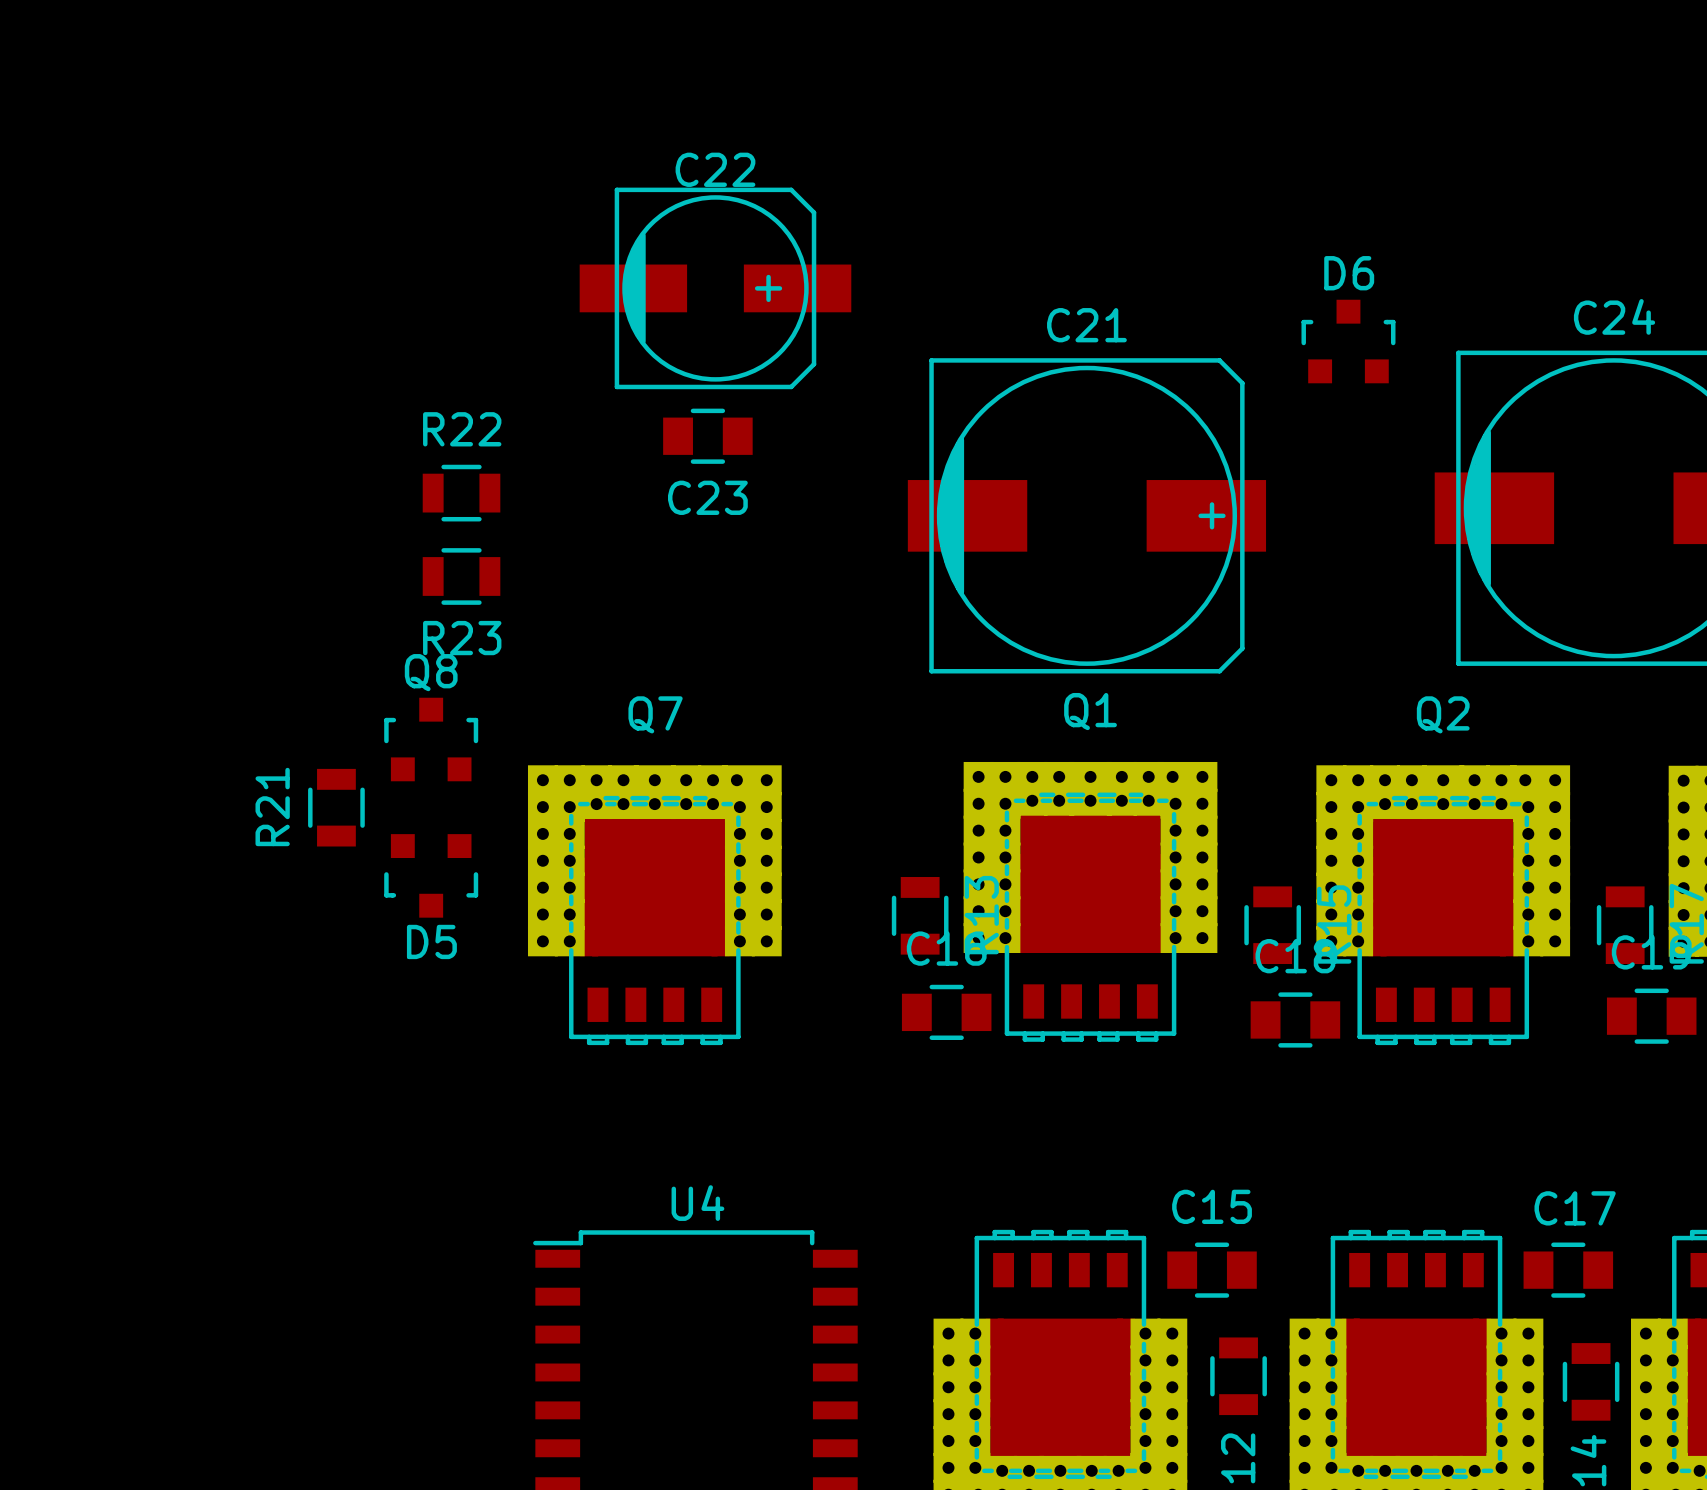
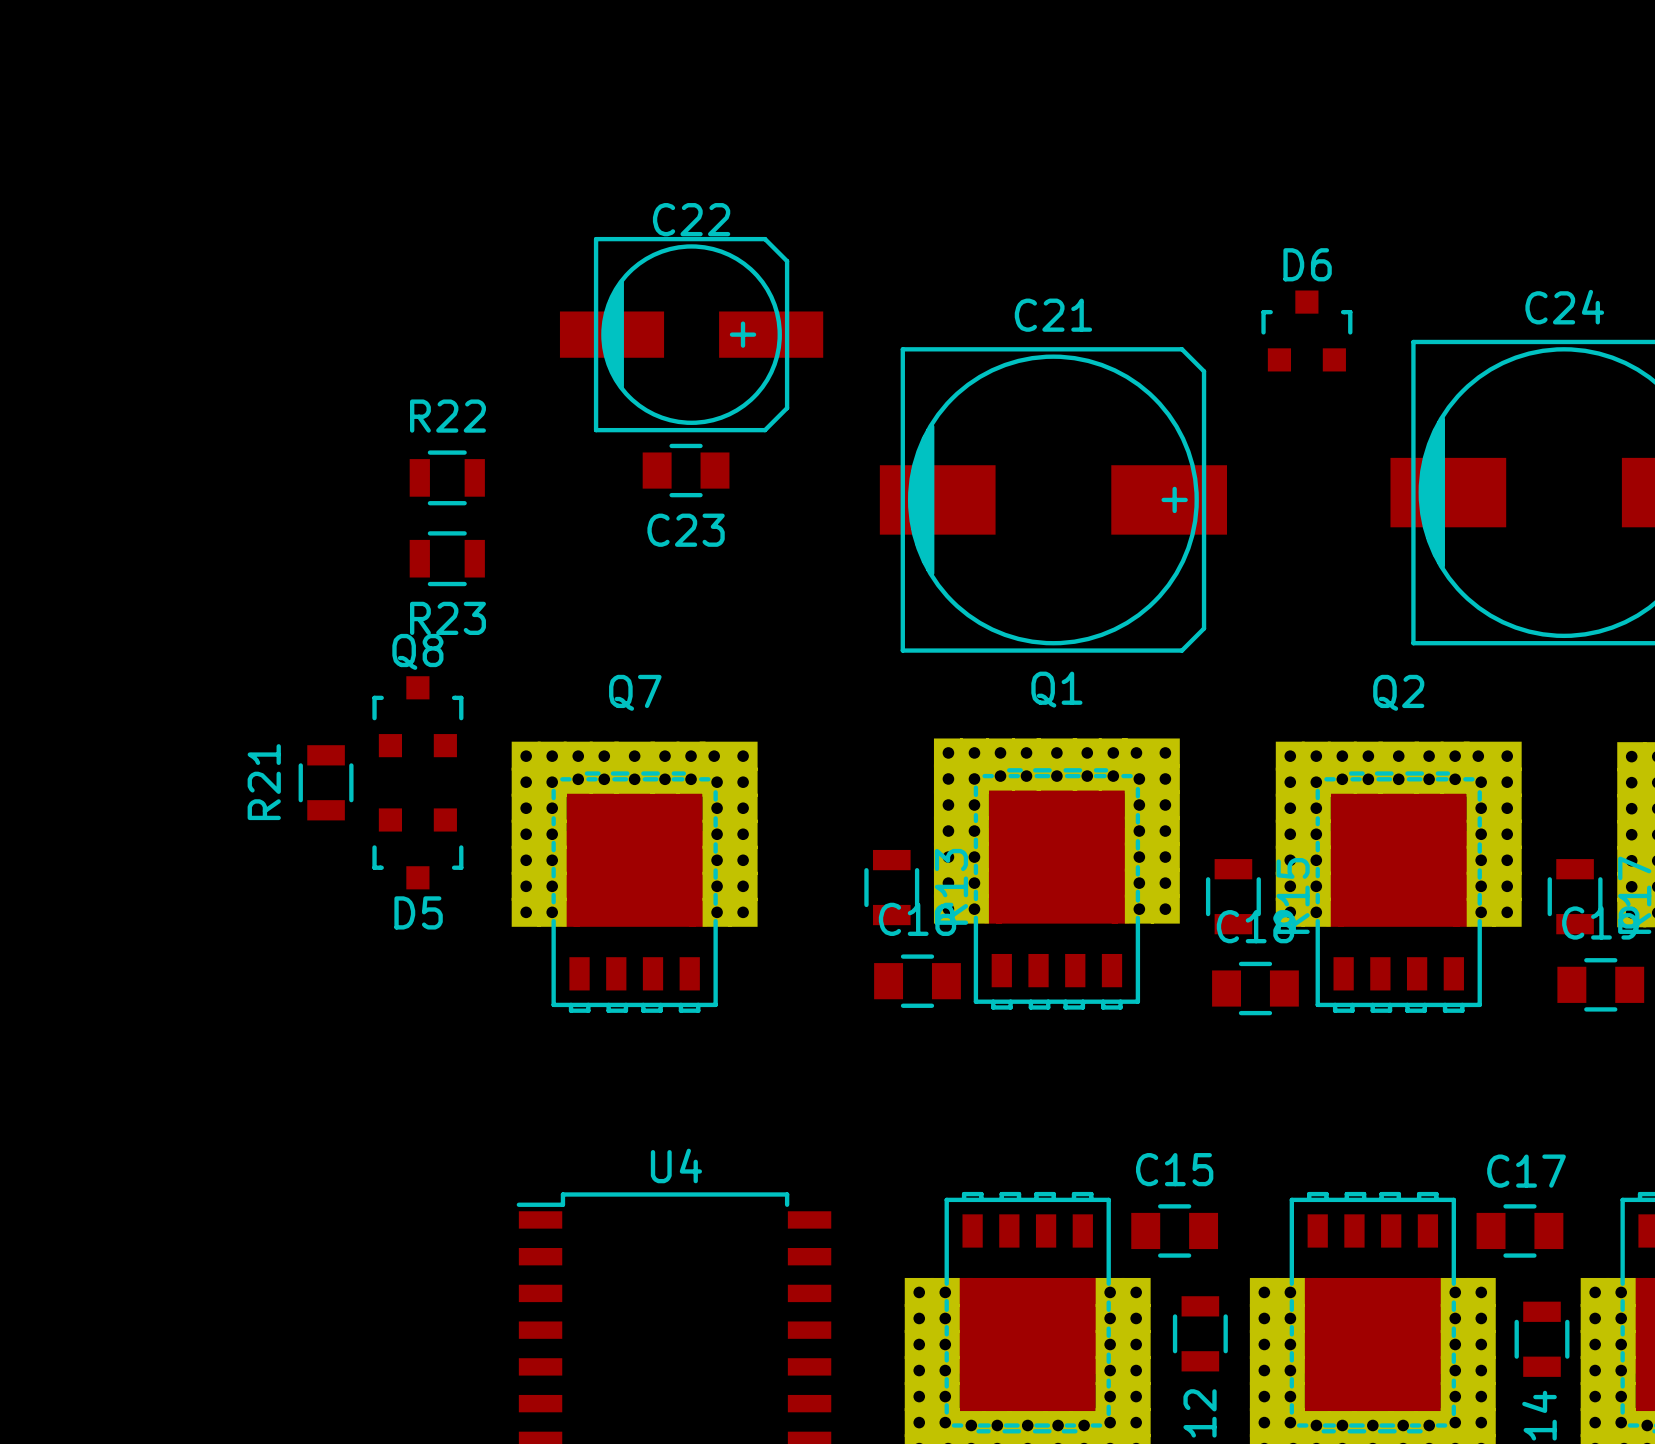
C22 position: (715, 288) -> (691, 334)
C23 position: (707, 436) -> (686, 470)

